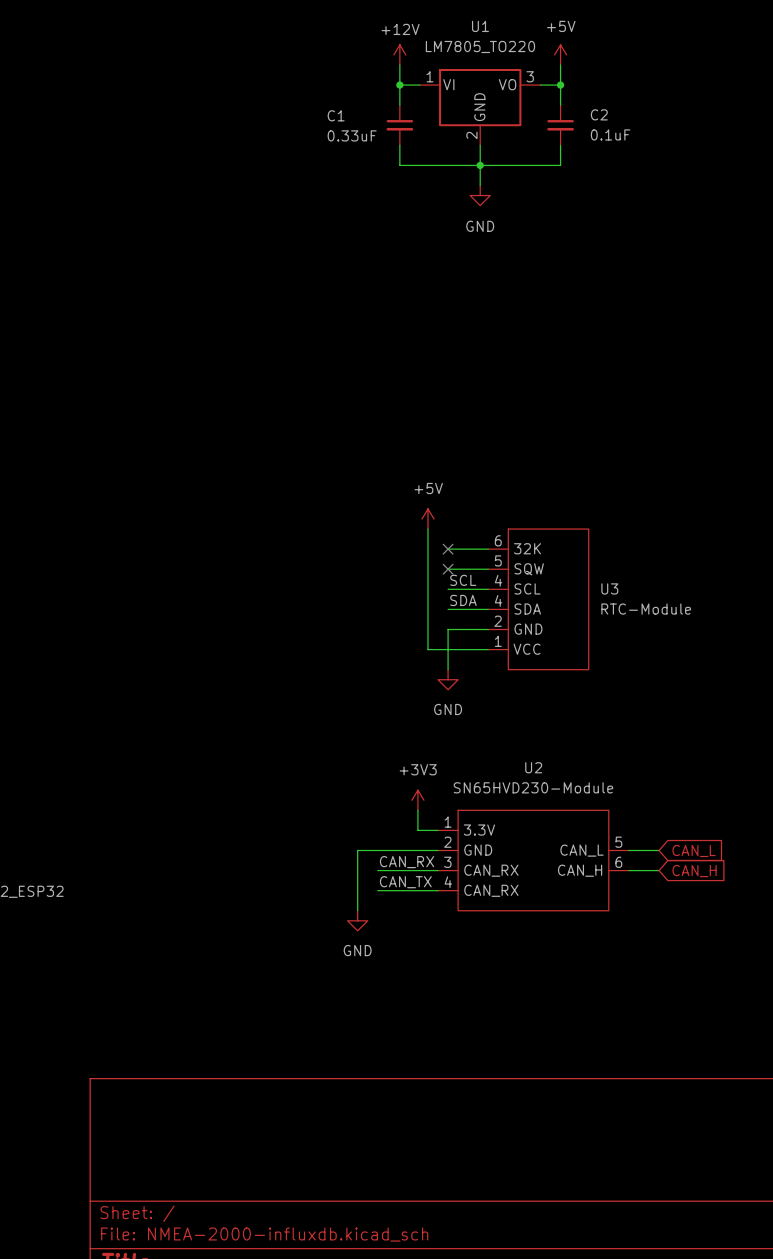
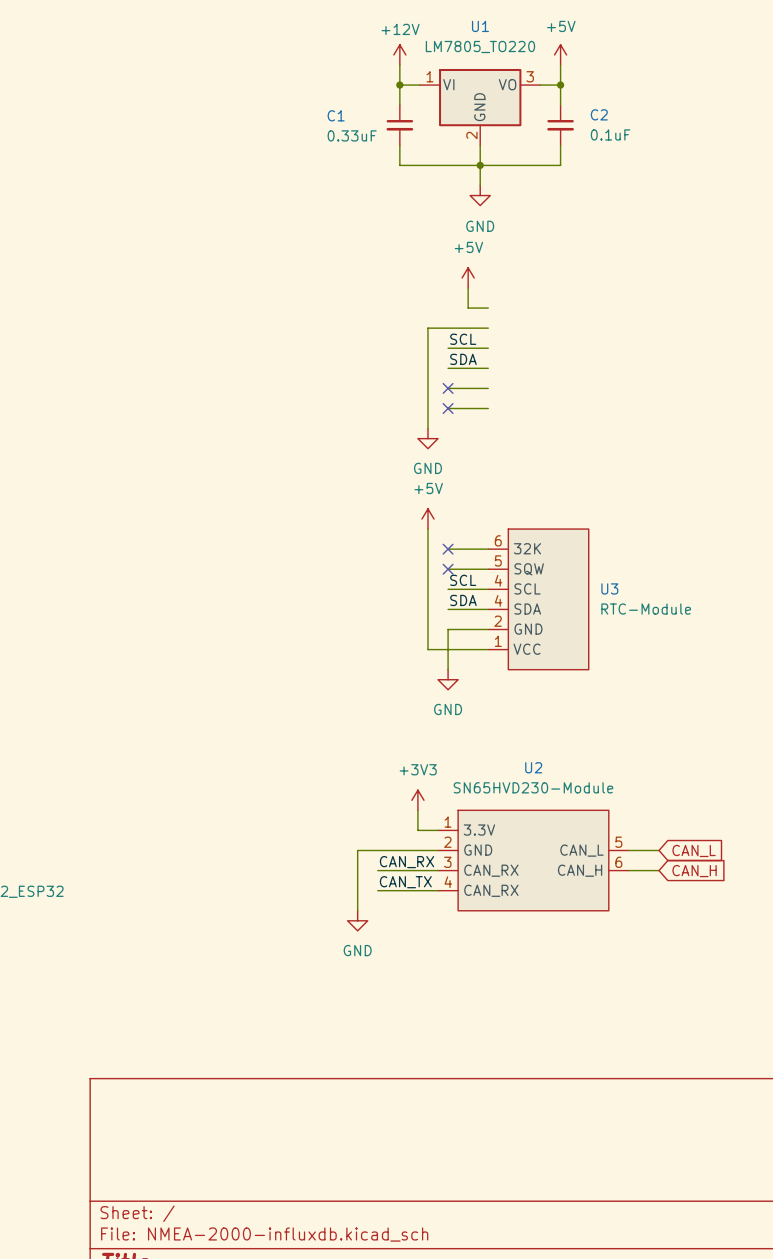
power symbol: none -> +5V (468, 277)
wire: none -> (468, 287) (468, 308) (488, 308)
wire: none -> (488, 328) (427, 328) (427, 428)
label: none -> SCL (463, 339)
wire: none -> (448, 348) (488, 348)
label: none -> SDA (463, 359)
wire: none -> (448, 368) (488, 368)
wire: none -> (448, 388) (488, 388)
no-connect mark: none -> (448, 388)
wire: none -> (448, 408) (488, 408)
no-connect mark: none -> (448, 408)
power symbol: none -> GND (427, 438)

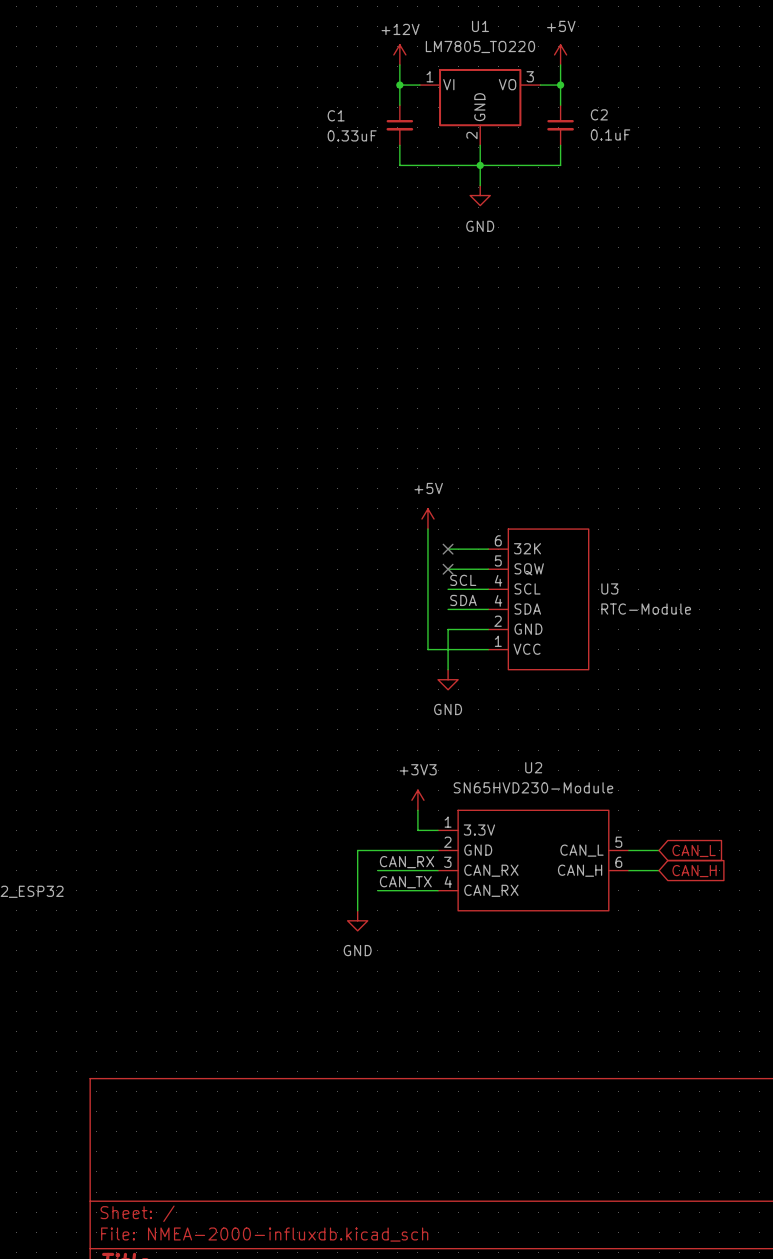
power symbol: +5V (468, 277) -> none
wire: (468, 287) (468, 308) (488, 308) -> none
wire: (488, 328) (427, 328) (427, 428) -> none
label: SCL (463, 339) -> none
wire: (448, 348) (488, 348) -> none
label: SDA (463, 359) -> none
wire: (448, 368) (488, 368) -> none
wire: (448, 388) (488, 388) -> none
no-connect mark: (448, 388) -> none
wire: (448, 408) (488, 408) -> none
no-connect mark: (448, 408) -> none
power symbol: GND (427, 438) -> none

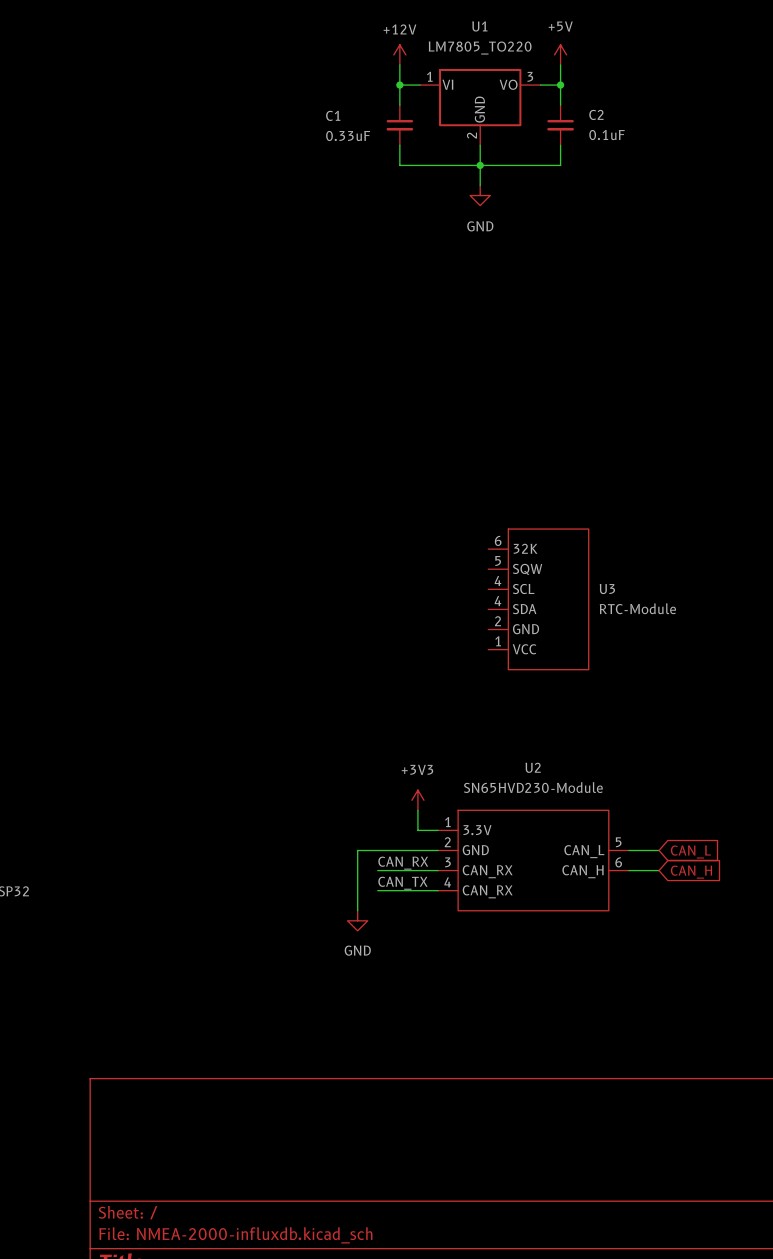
power symbol: +5V (427, 519) -> none
wire: (427, 529) (427, 649) (488, 649) -> none
wire: (448, 549) (488, 549) -> none
no-connect mark: (448, 549) -> none
wire: (448, 569) (488, 569) -> none
no-connect mark: (448, 569) -> none
label: SCL (463, 580) -> none
wire: (448, 589) (488, 589) -> none
label: SDA (463, 600) -> none
wire: (448, 609) (488, 609) -> none
wire: (488, 629) (448, 629) (448, 669) -> none
power symbol: GND (448, 679) -> none

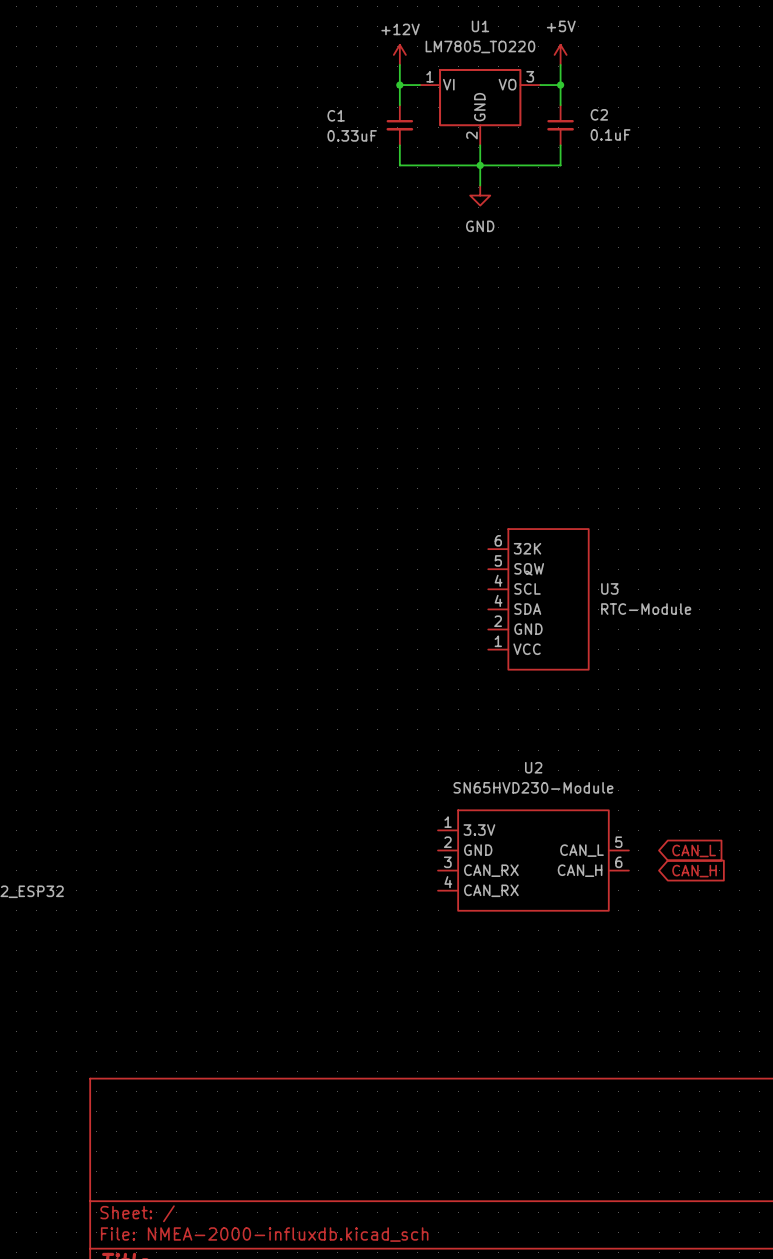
power symbol: +3V3 (417, 800) -> none
wire: (417, 810) (417, 830) (438, 830) -> none
wire: (438, 850) (357, 850) (357, 910) -> none
wire: (628, 850) (659, 850) -> none
label: CAN_RX (403, 863) -> none
wire: (377, 870) (438, 870) -> none
wire: (628, 870) (659, 870) -> none
label: CAN_TX (402, 883) -> none
wire: (377, 890) (438, 890) -> none
power symbol: GND (357, 920) -> none

